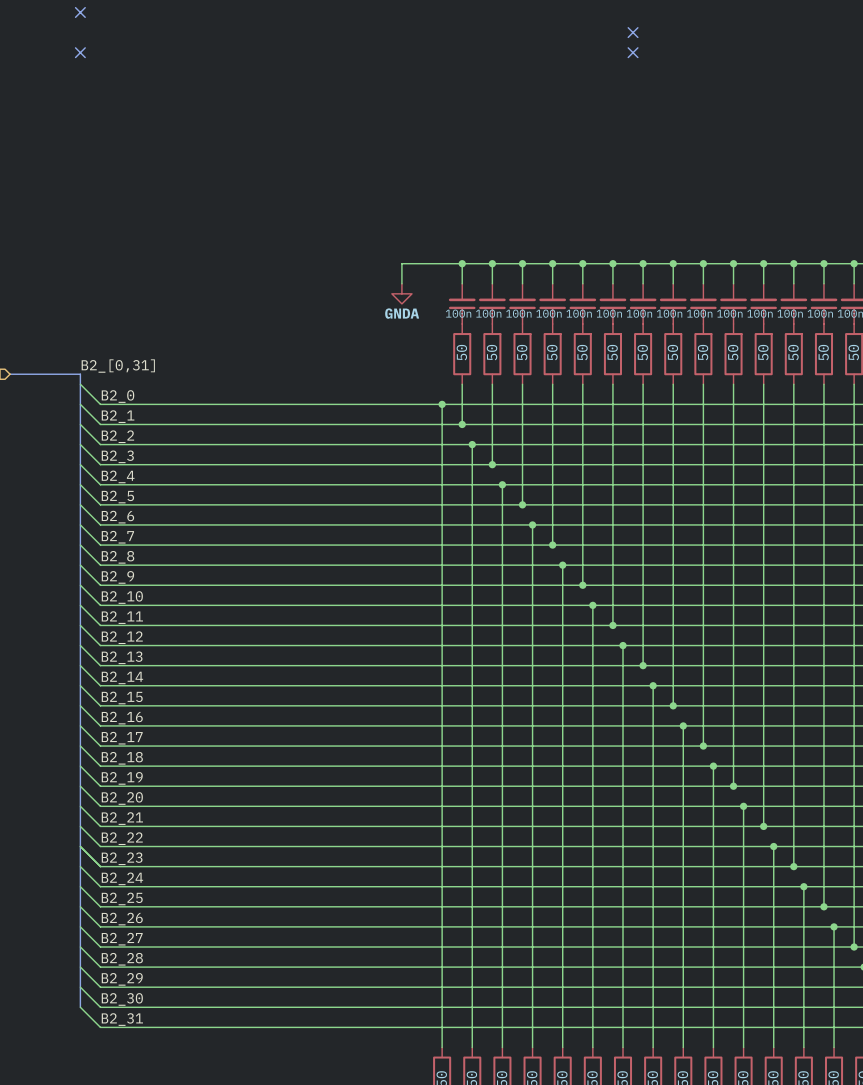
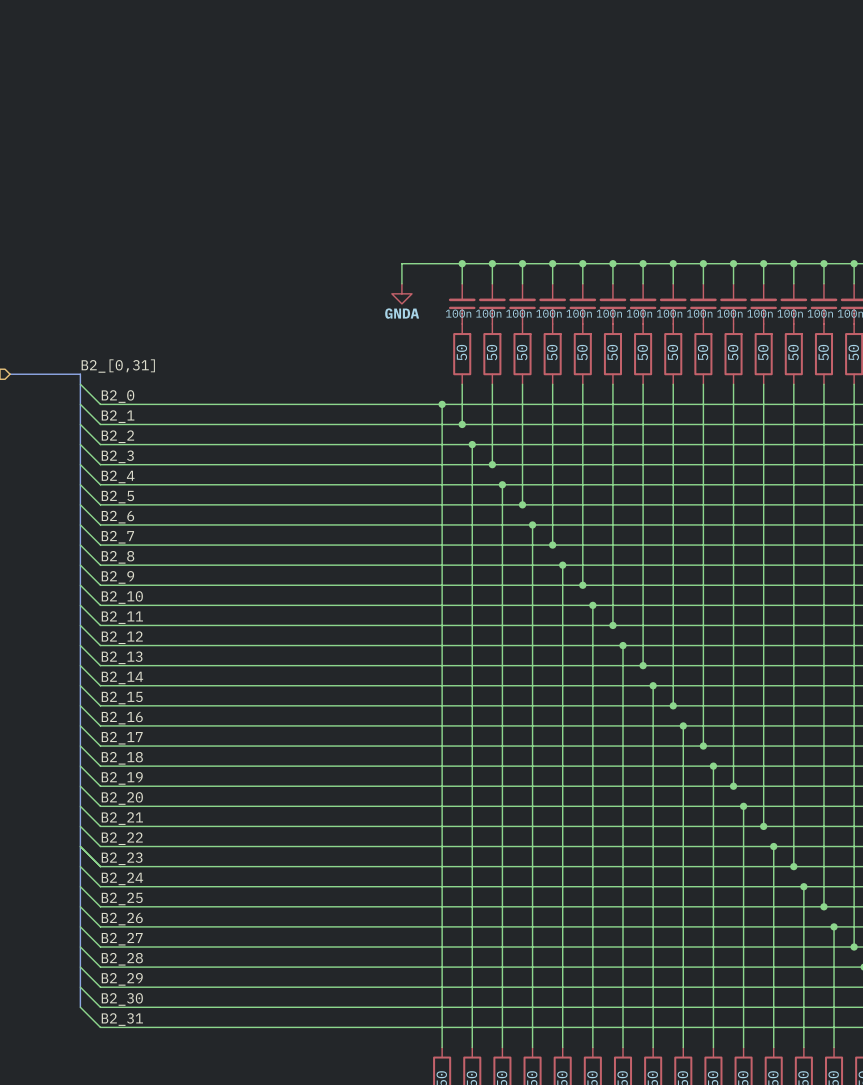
no-connect mark: (80, 12) -> none
no-connect mark: (633, 32) -> none
no-connect mark: (80, 52) -> none
no-connect mark: (633, 52) -> none

